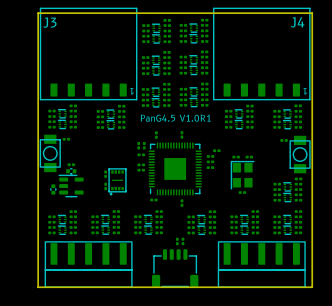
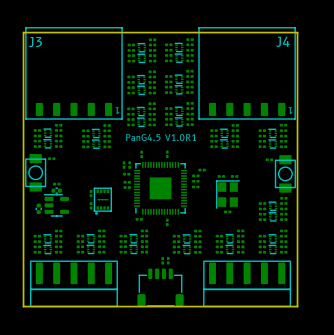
part: none -> (127, 182)
part: (141, 164) -> none
part: none -> (127, 187)
part: (141, 170) -> none

